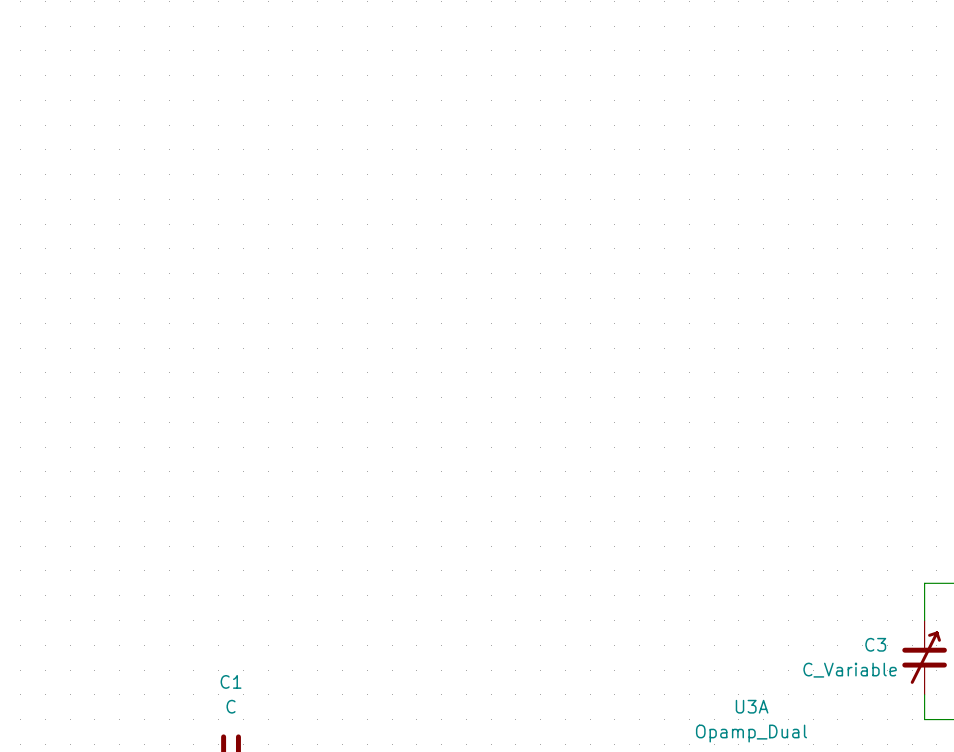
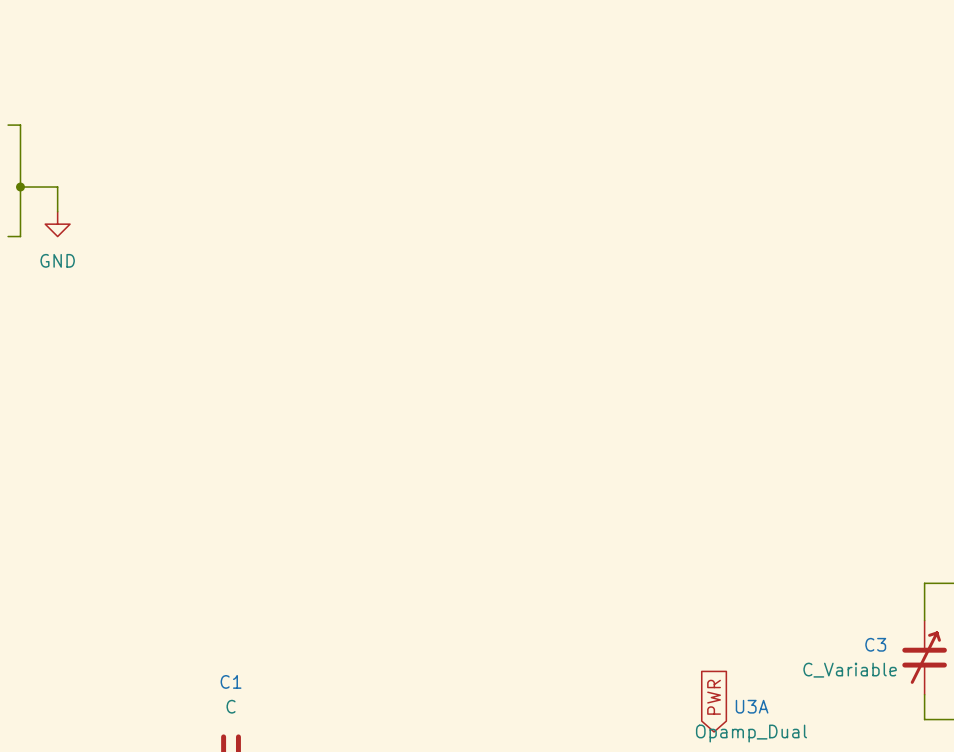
wire: none -> (8, 125) (20, 125) (20, 236) (8, 236)
wire: none -> (20, 187) (57, 187) (57, 211)
junction: none -> (20, 187)
power symbol: none -> GND (57, 224)
global label: none -> PWR (714, 697)

